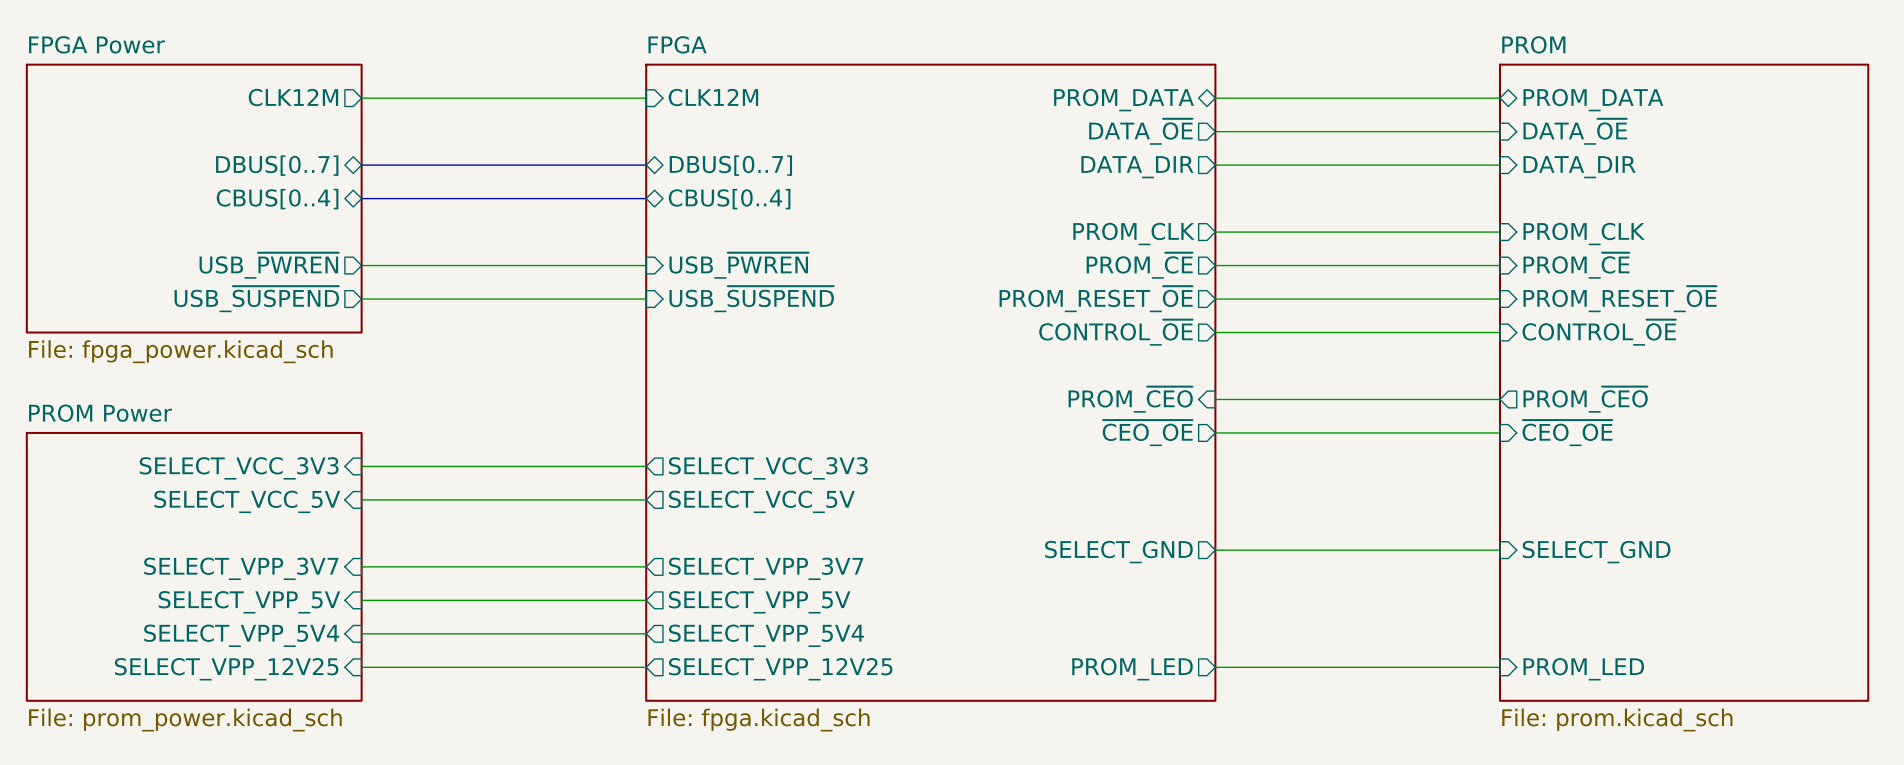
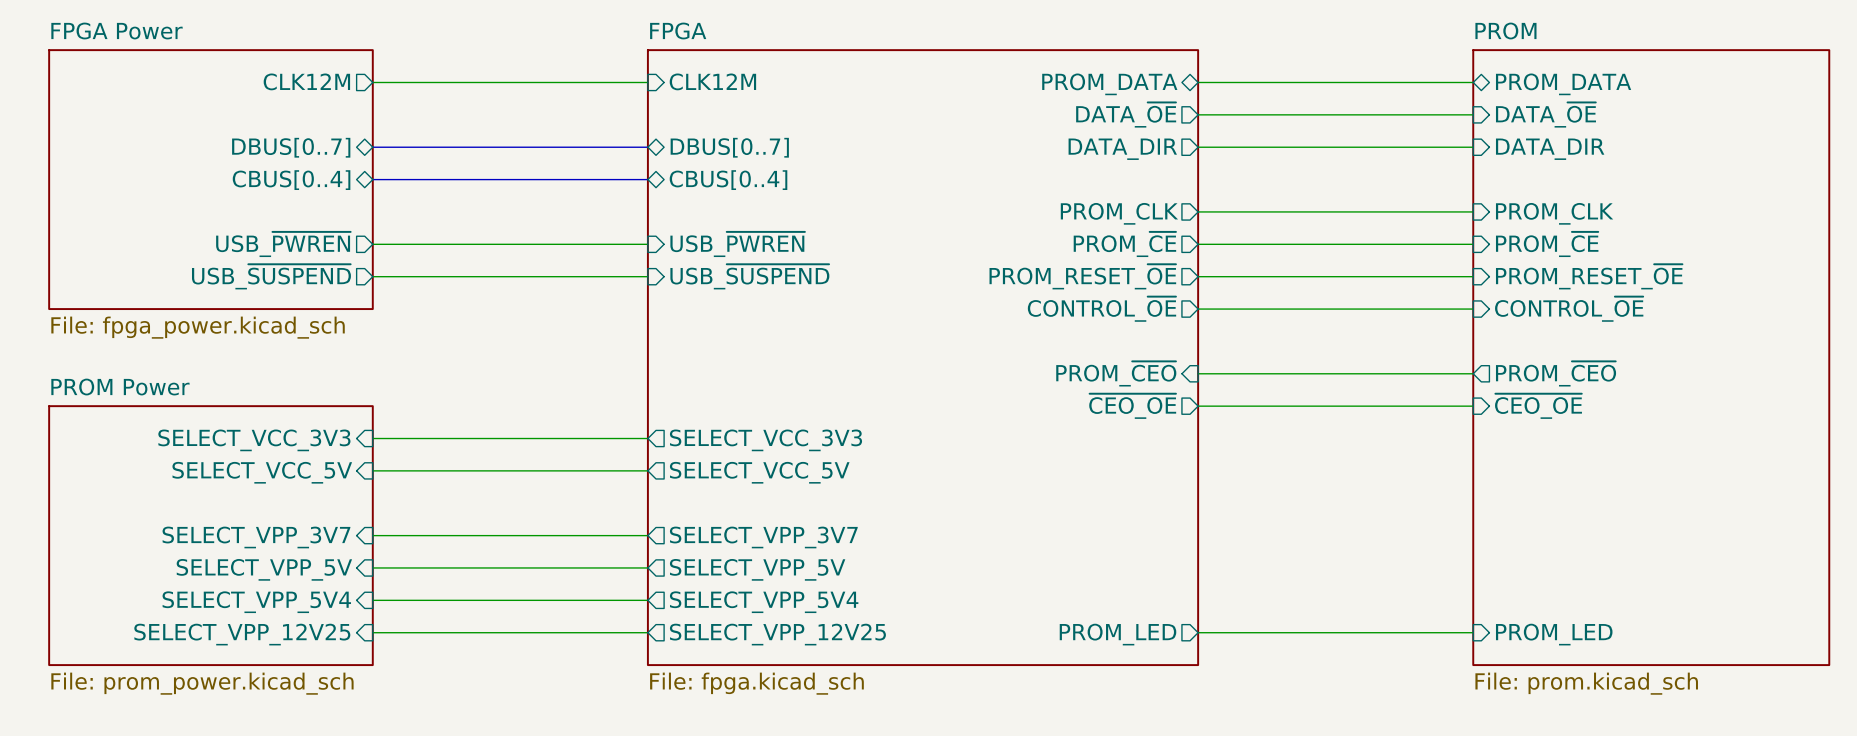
wire: (1215, 550) (1499, 550) -> none
sheet pin: SELECT_GND (1118, 552) -> none
sheet pin: SELECT_GND (1596, 552) -> none

